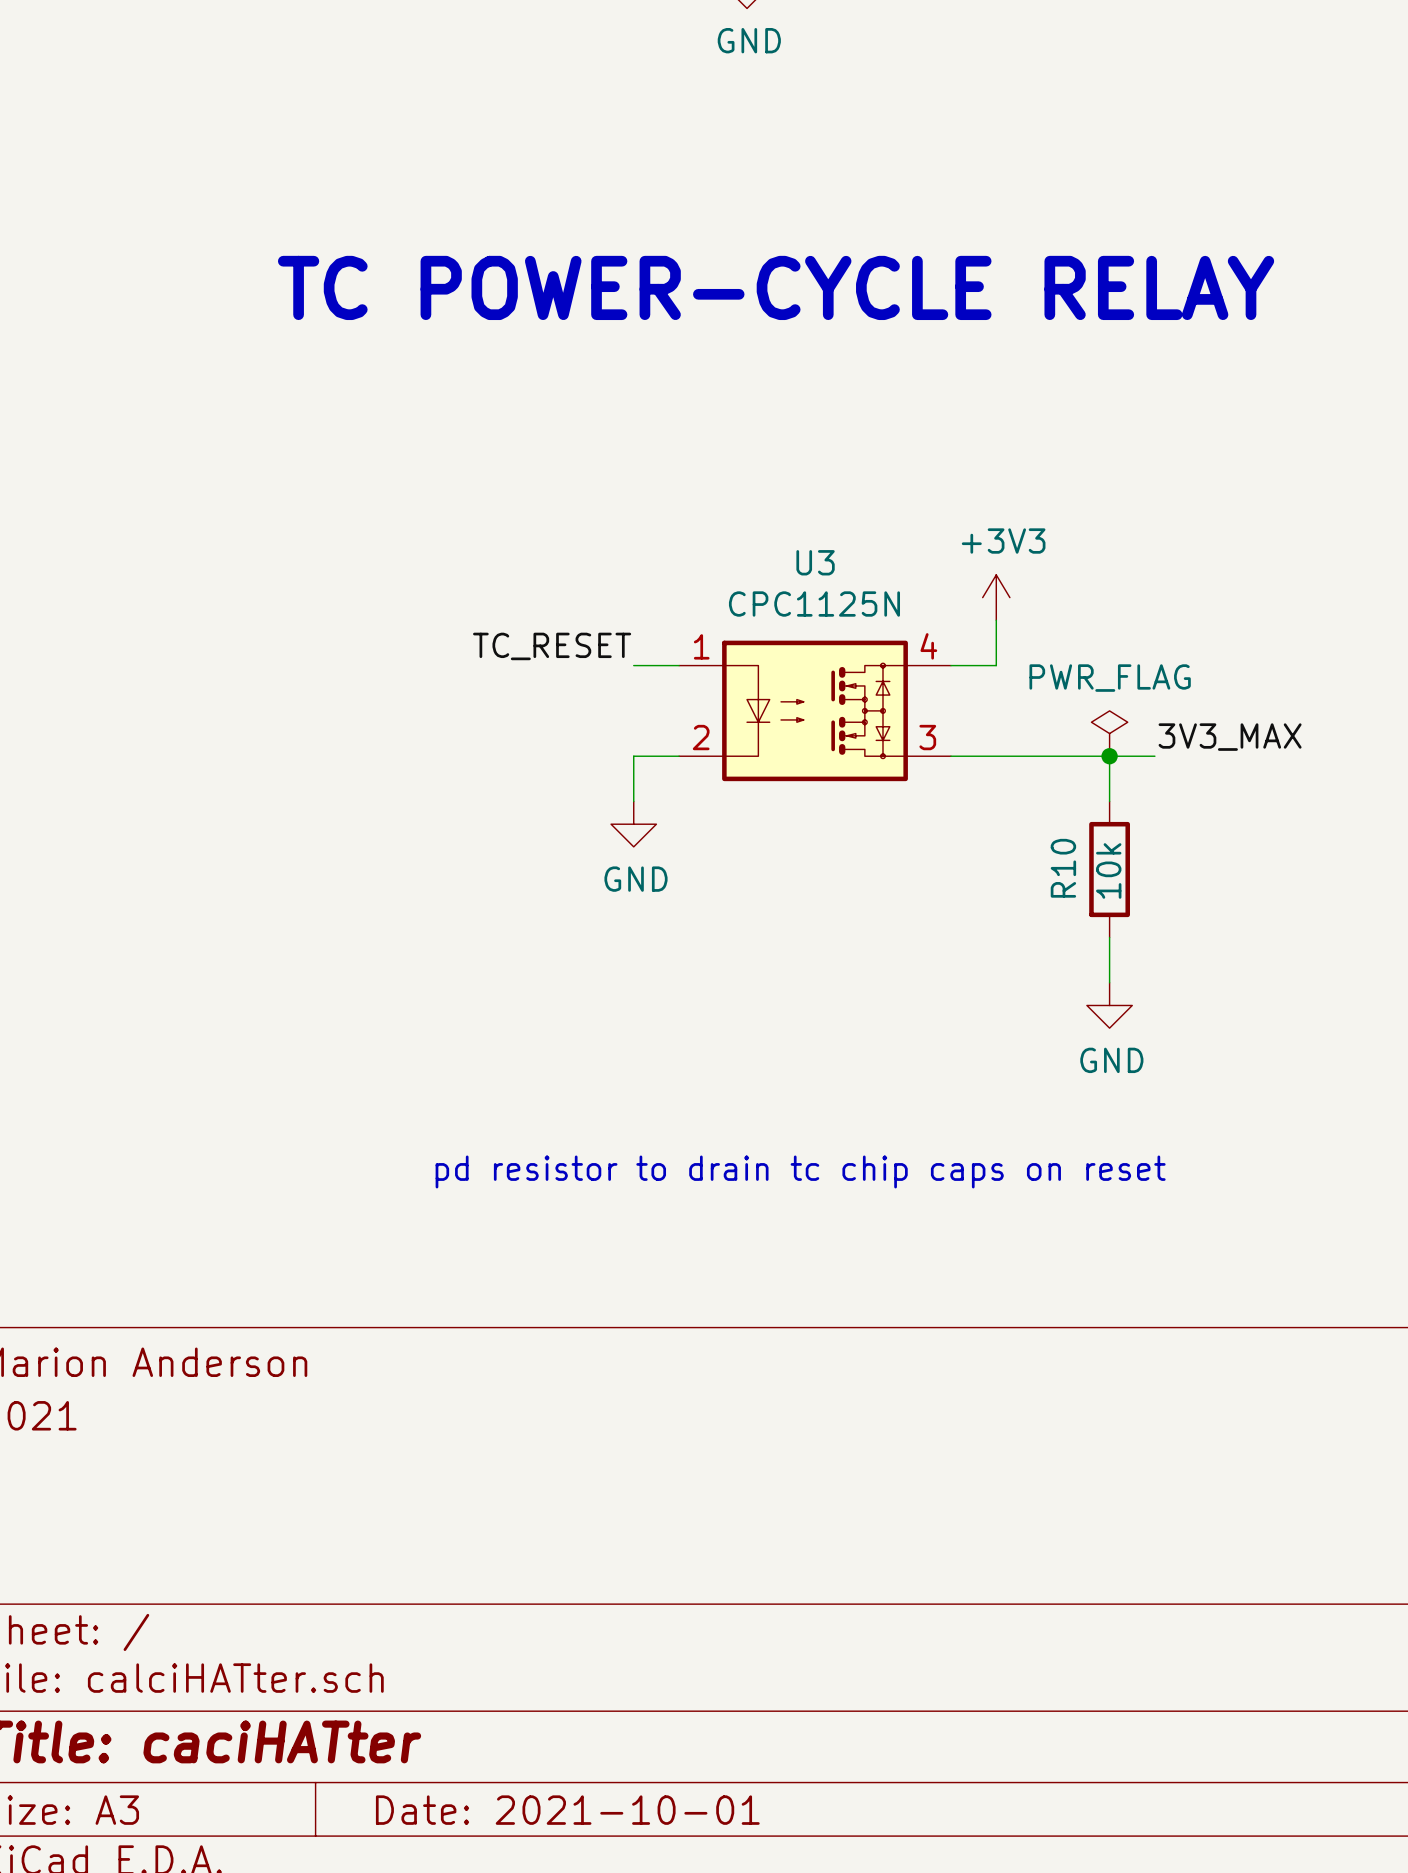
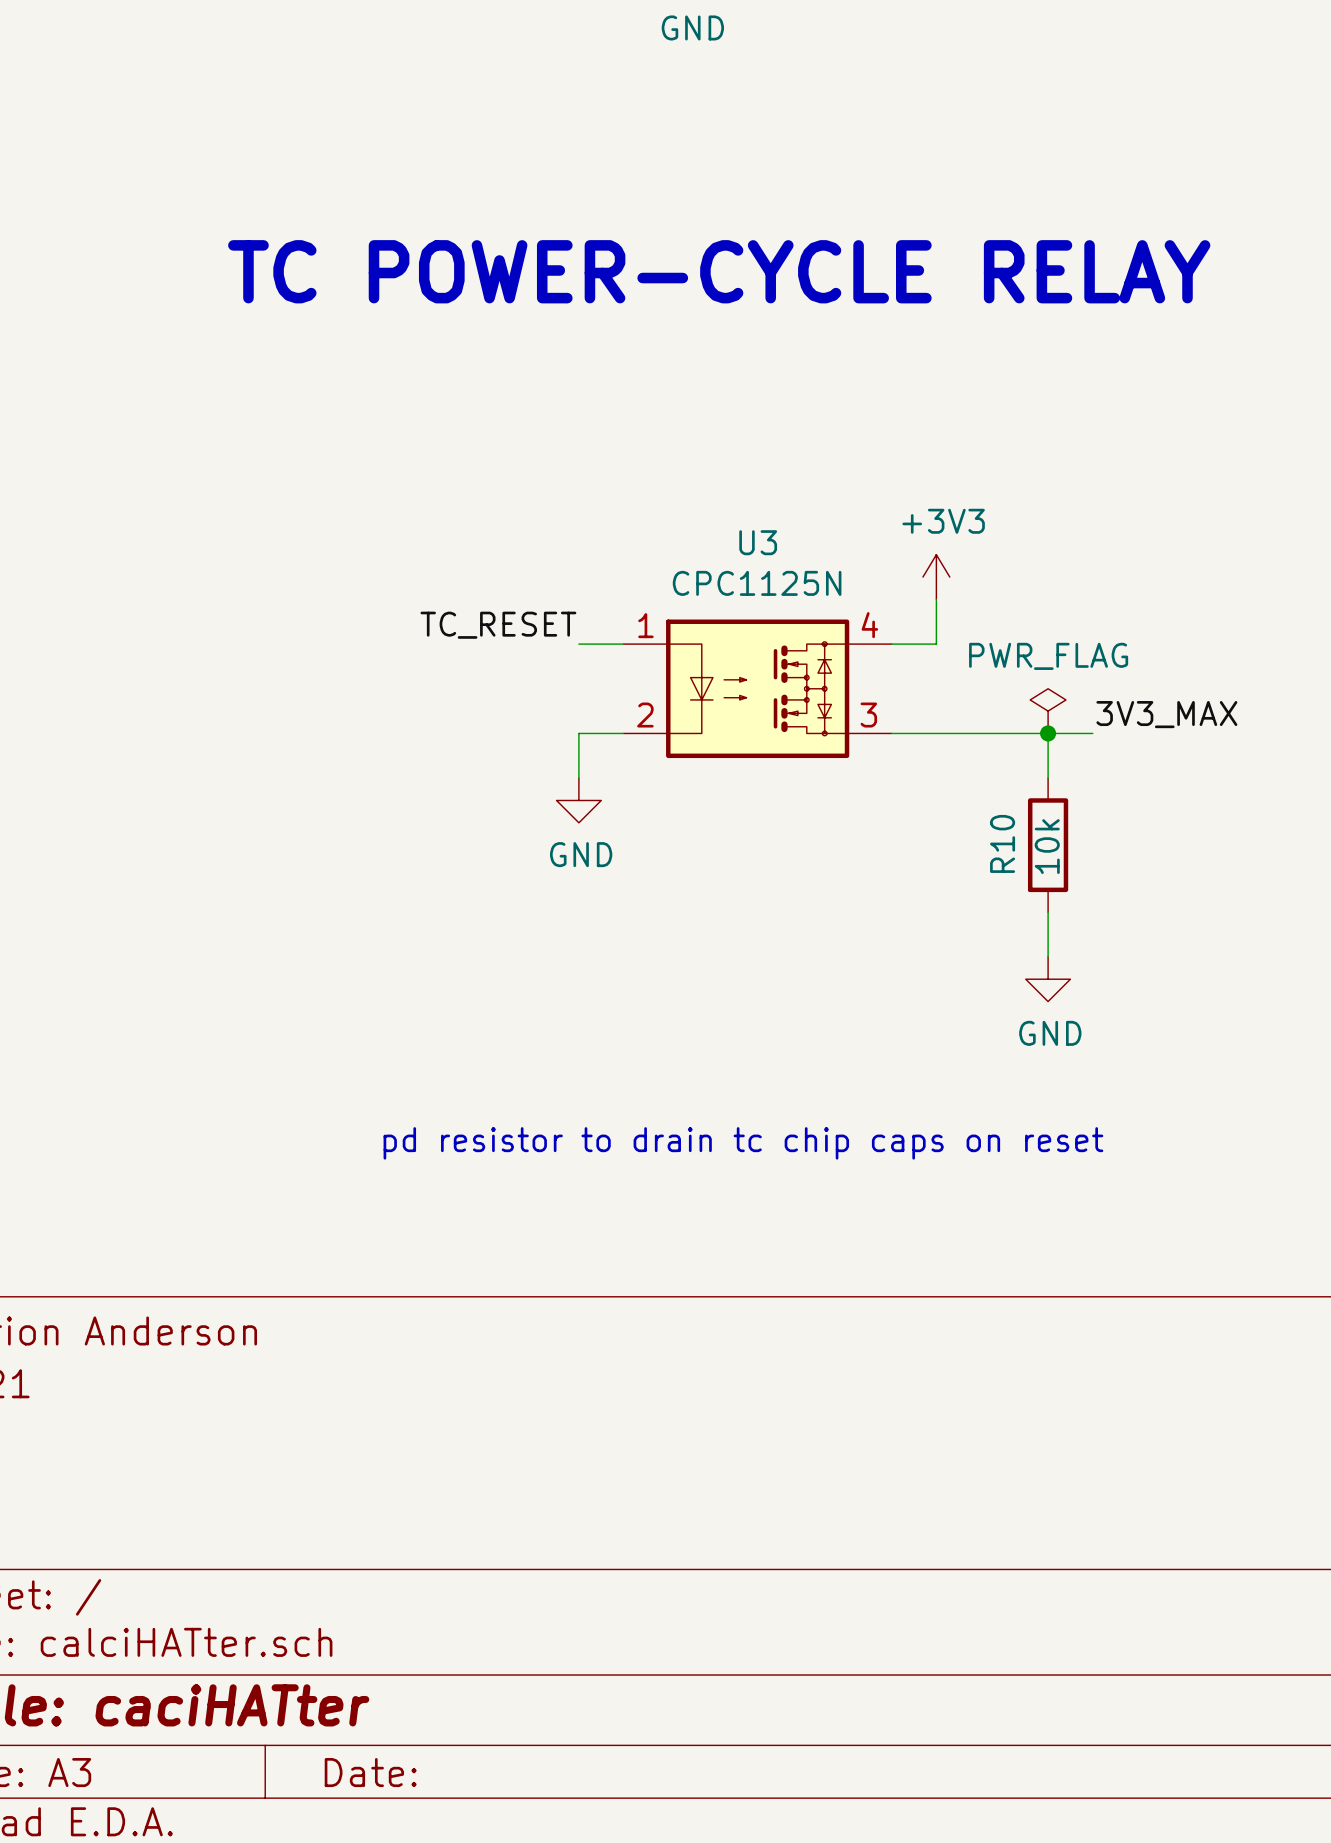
title block: Date: 2021-10-01 (567, 1810) -> Date: (370, 1772)

